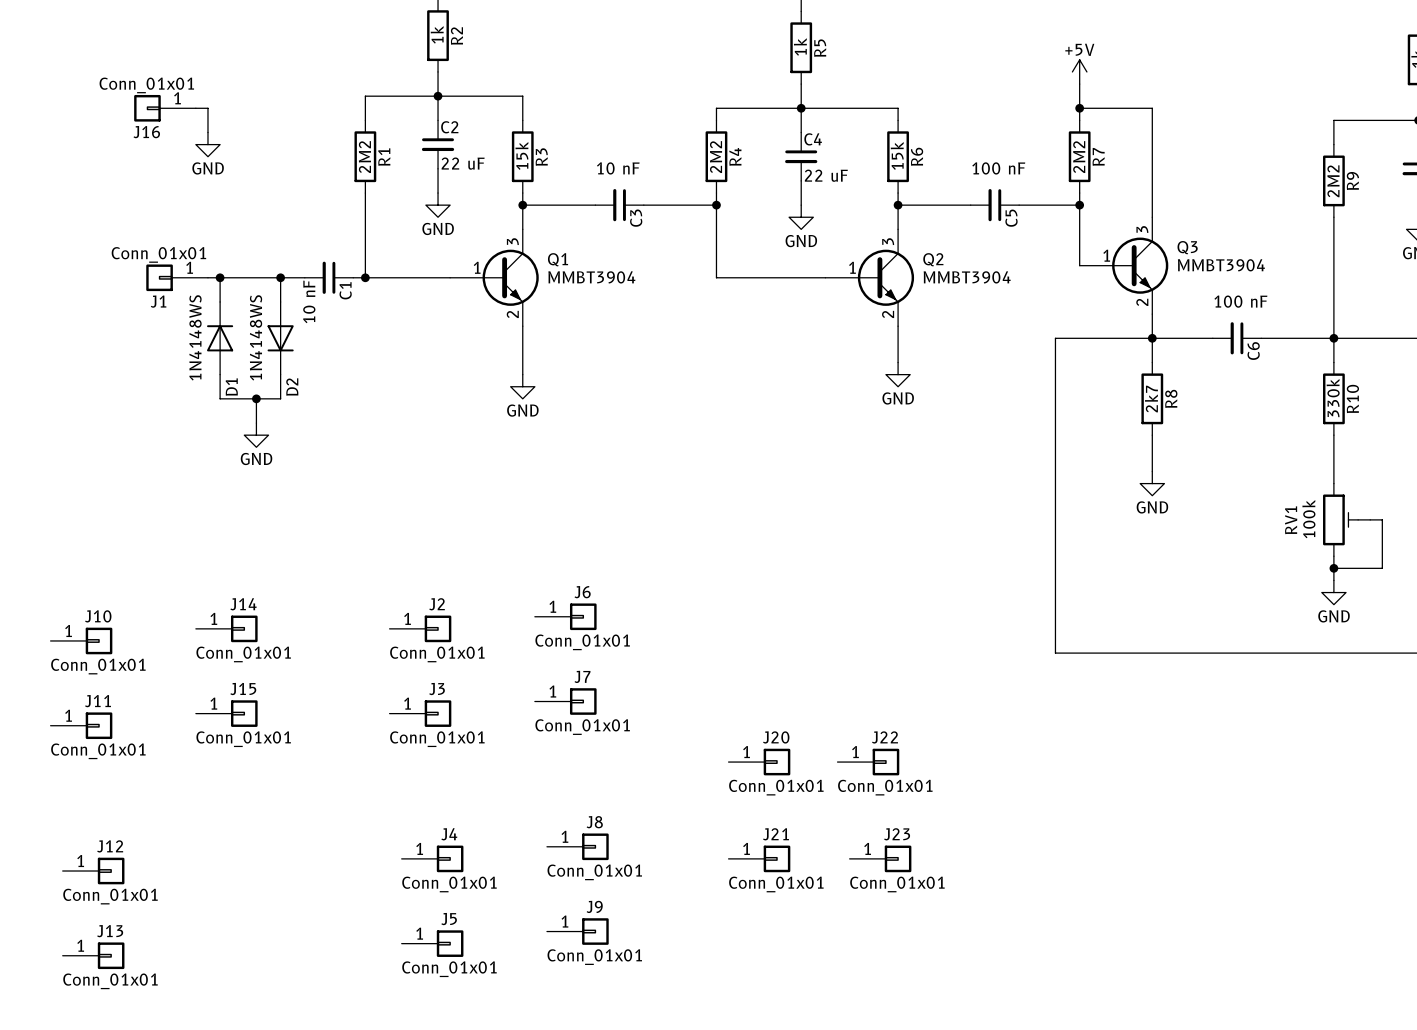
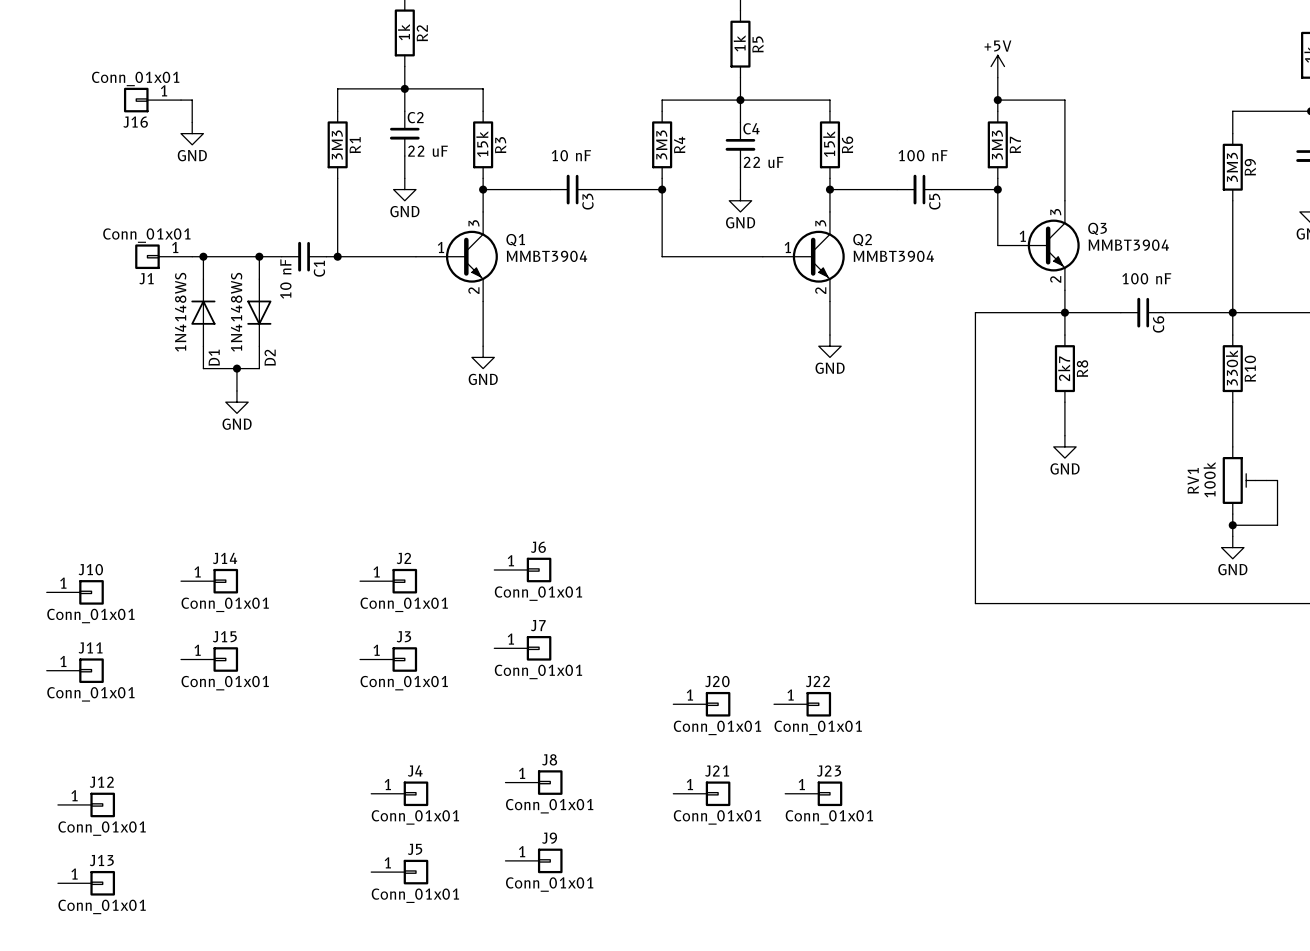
R1 value: 2M2 (364, 157) -> 3M3 (337, 144)
R4 value: 2M2 (716, 157) -> 3M3 (661, 144)
R7 value: 2M2 (1079, 157) -> 3M3 (997, 144)
R9 value: 2M2 (1333, 181) -> 3M3 (1232, 167)

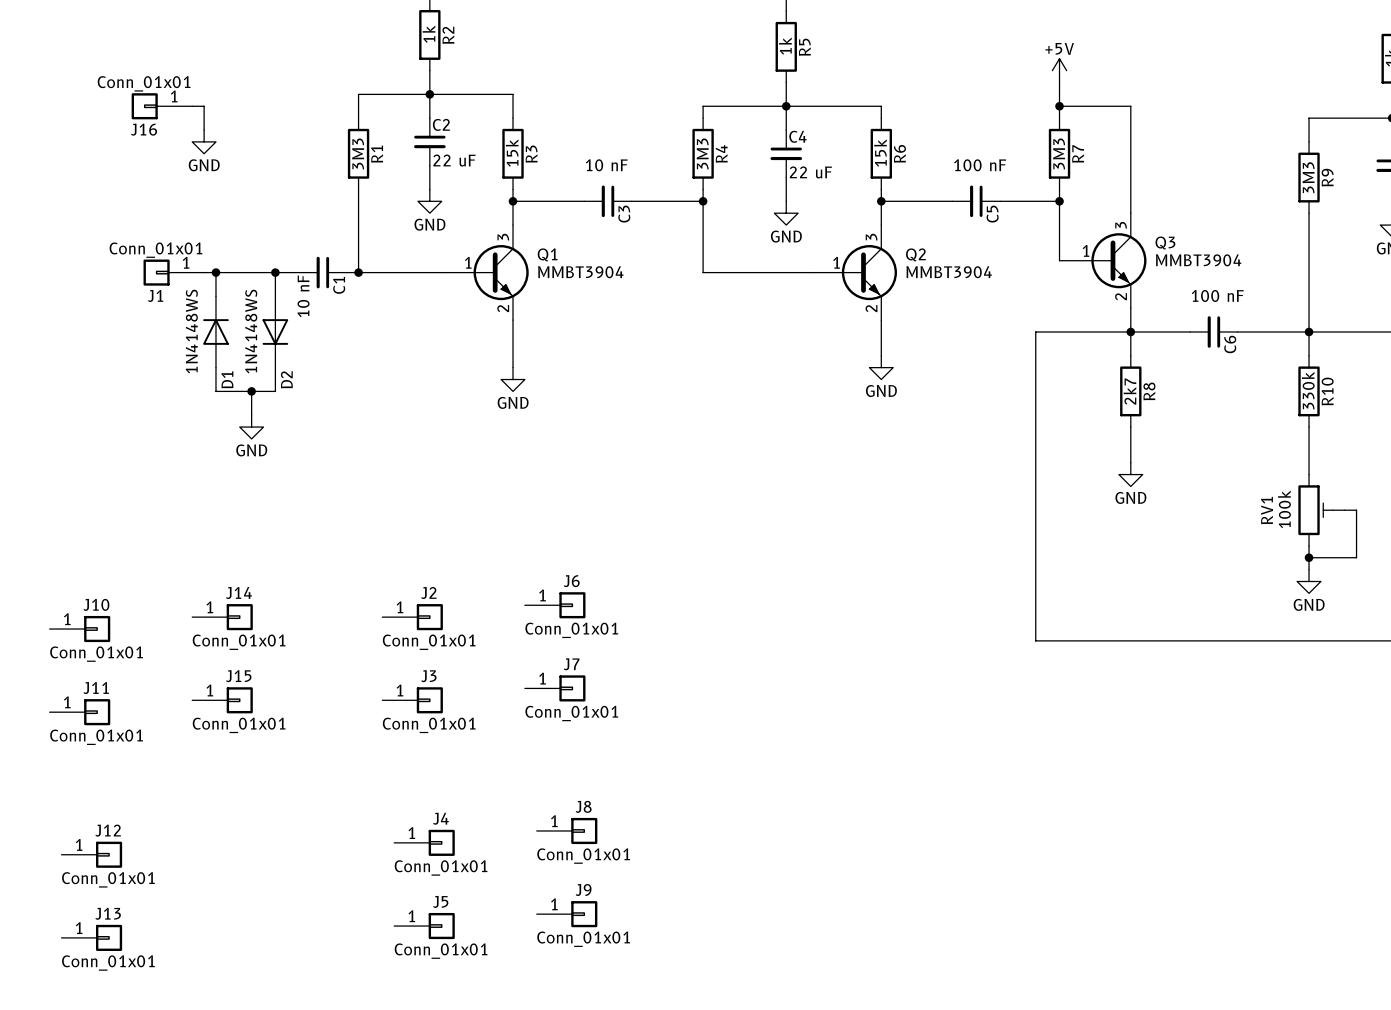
J20: Conn_01x01 (701, 704) -> none
J22: Conn_01x01 (802, 704) -> none
J21: Conn_01x01 (701, 793) -> none
J23: Conn_01x01 (813, 793) -> none

